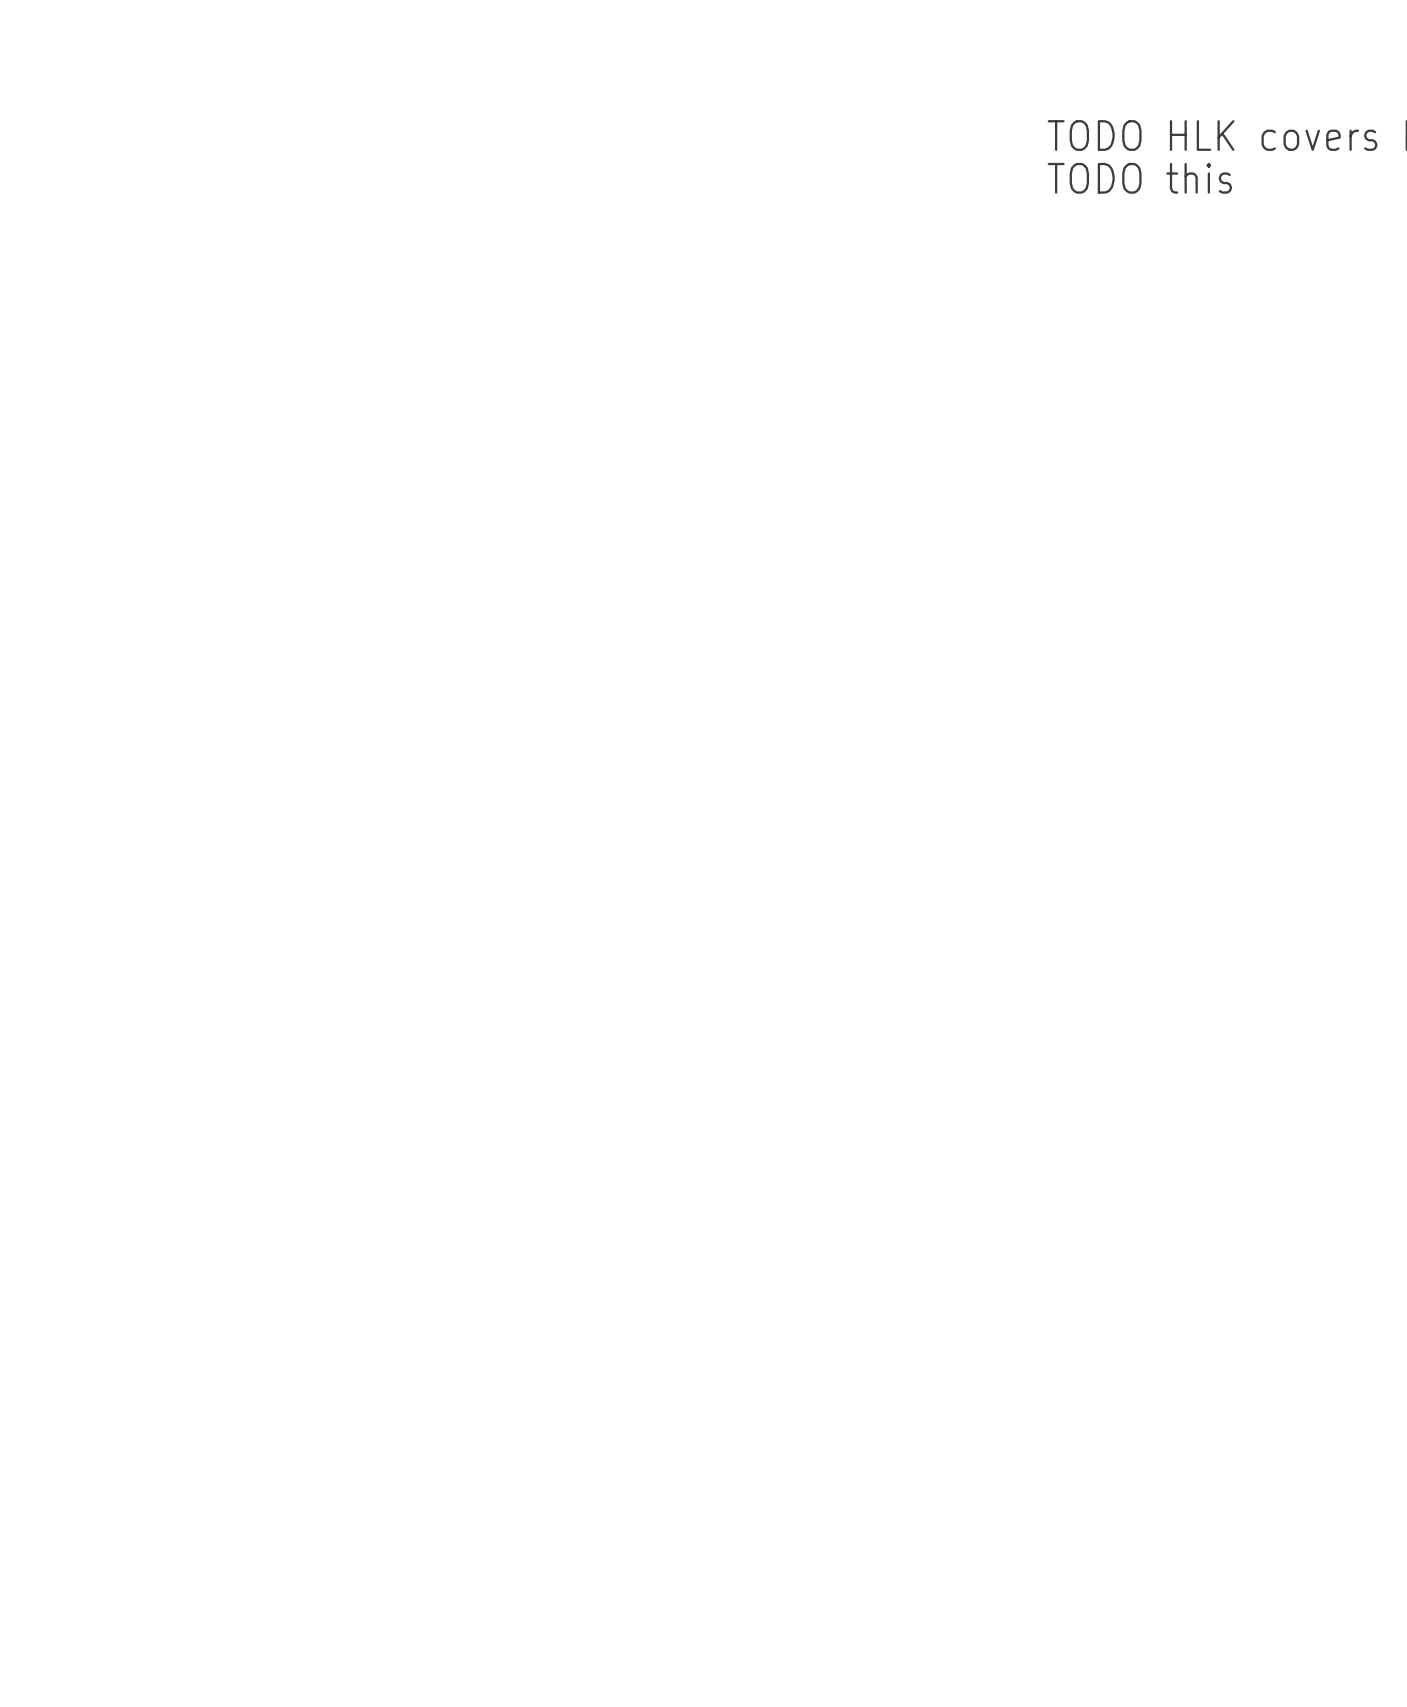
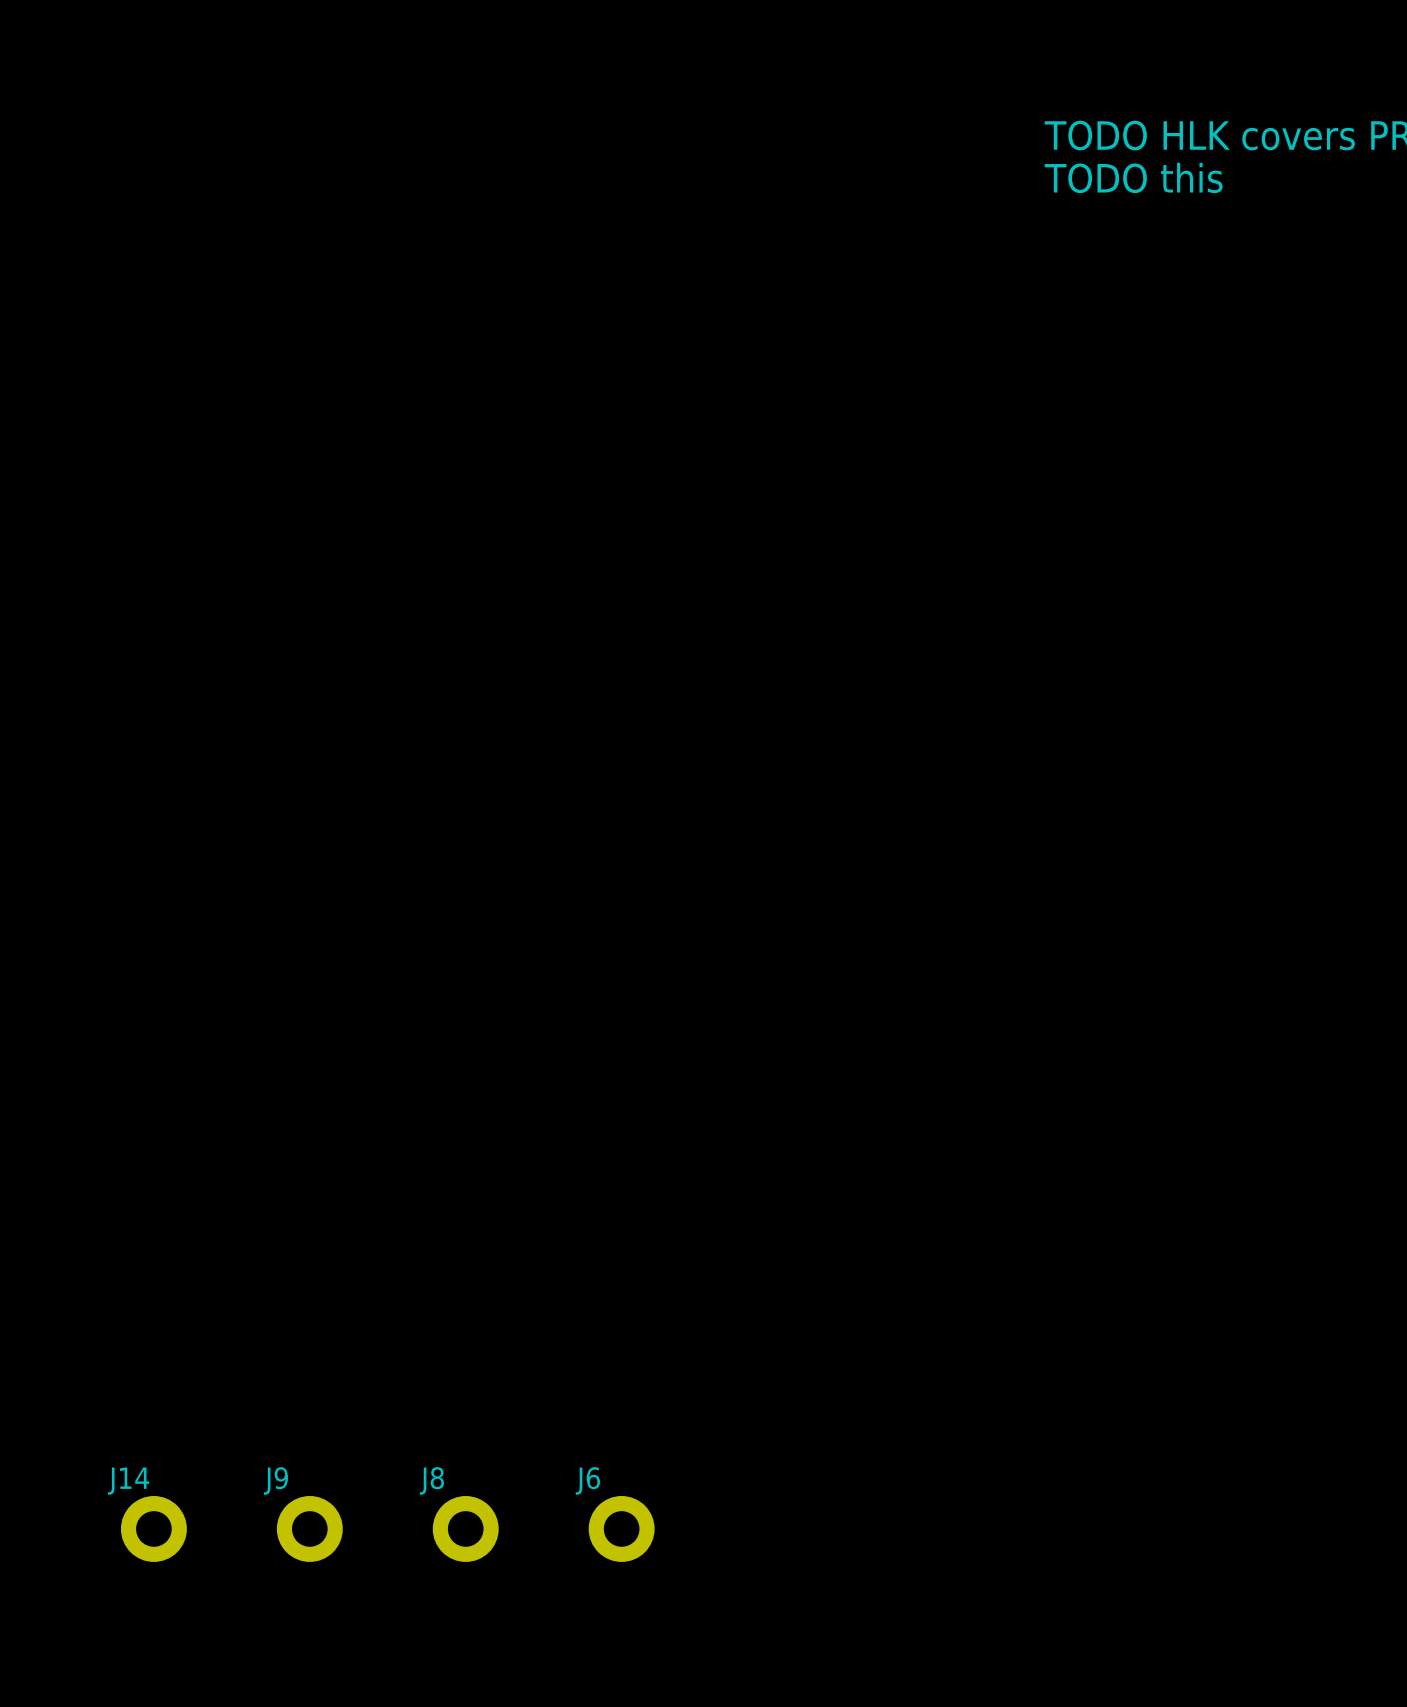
J14: none -> (153, 1528)
J9: none -> (309, 1528)
J8: none -> (465, 1528)
J6: none -> (621, 1528)

